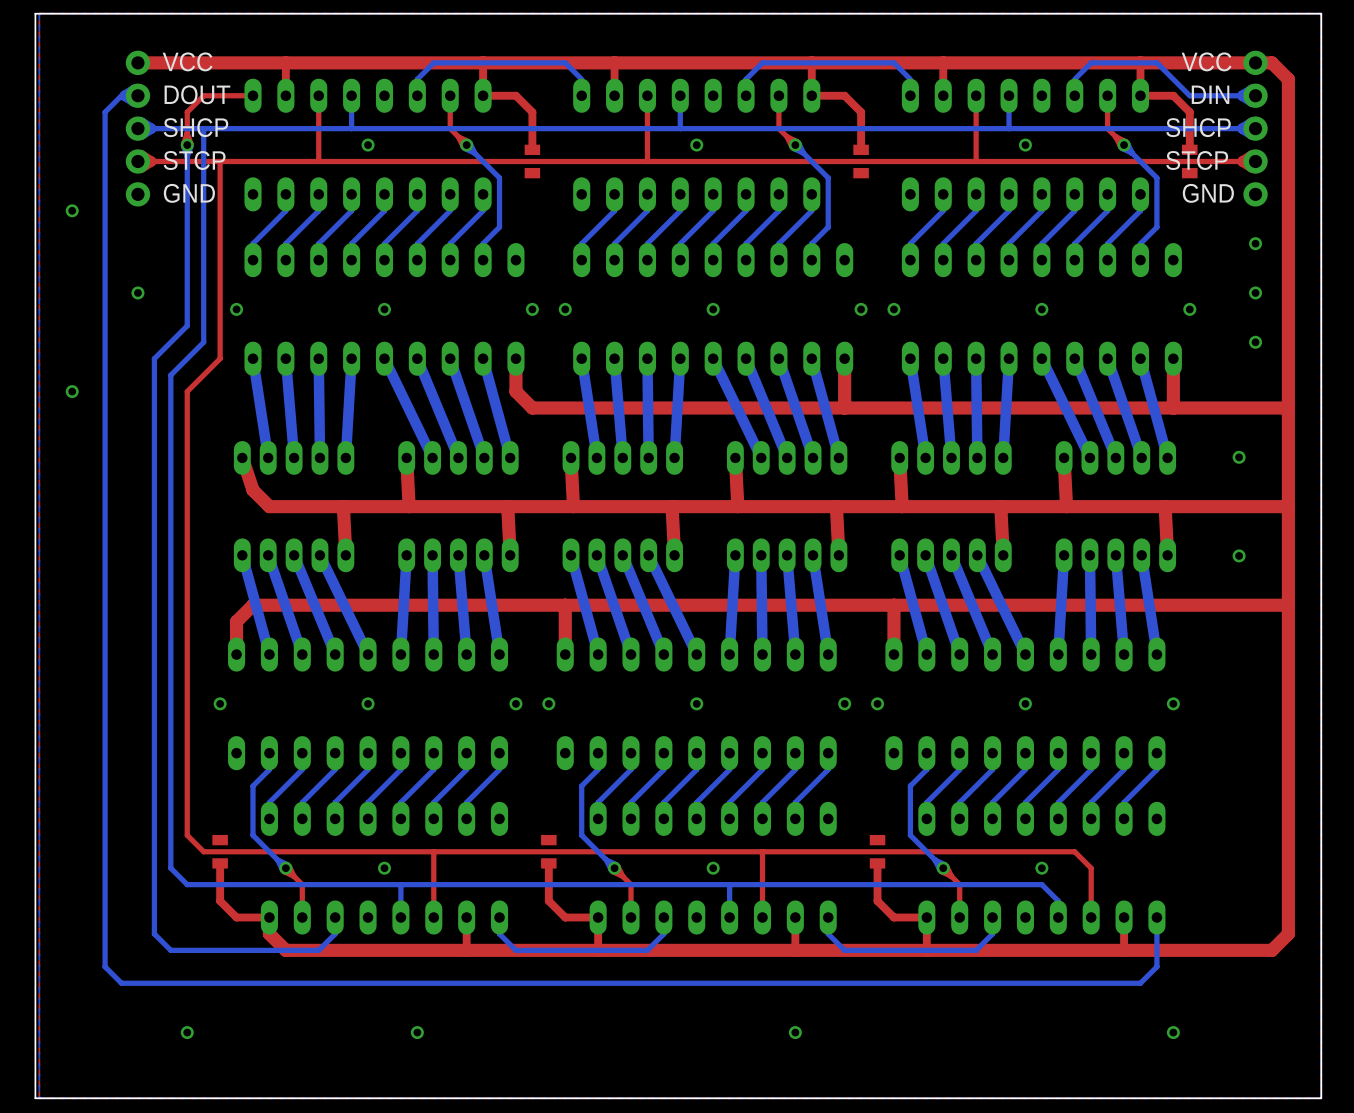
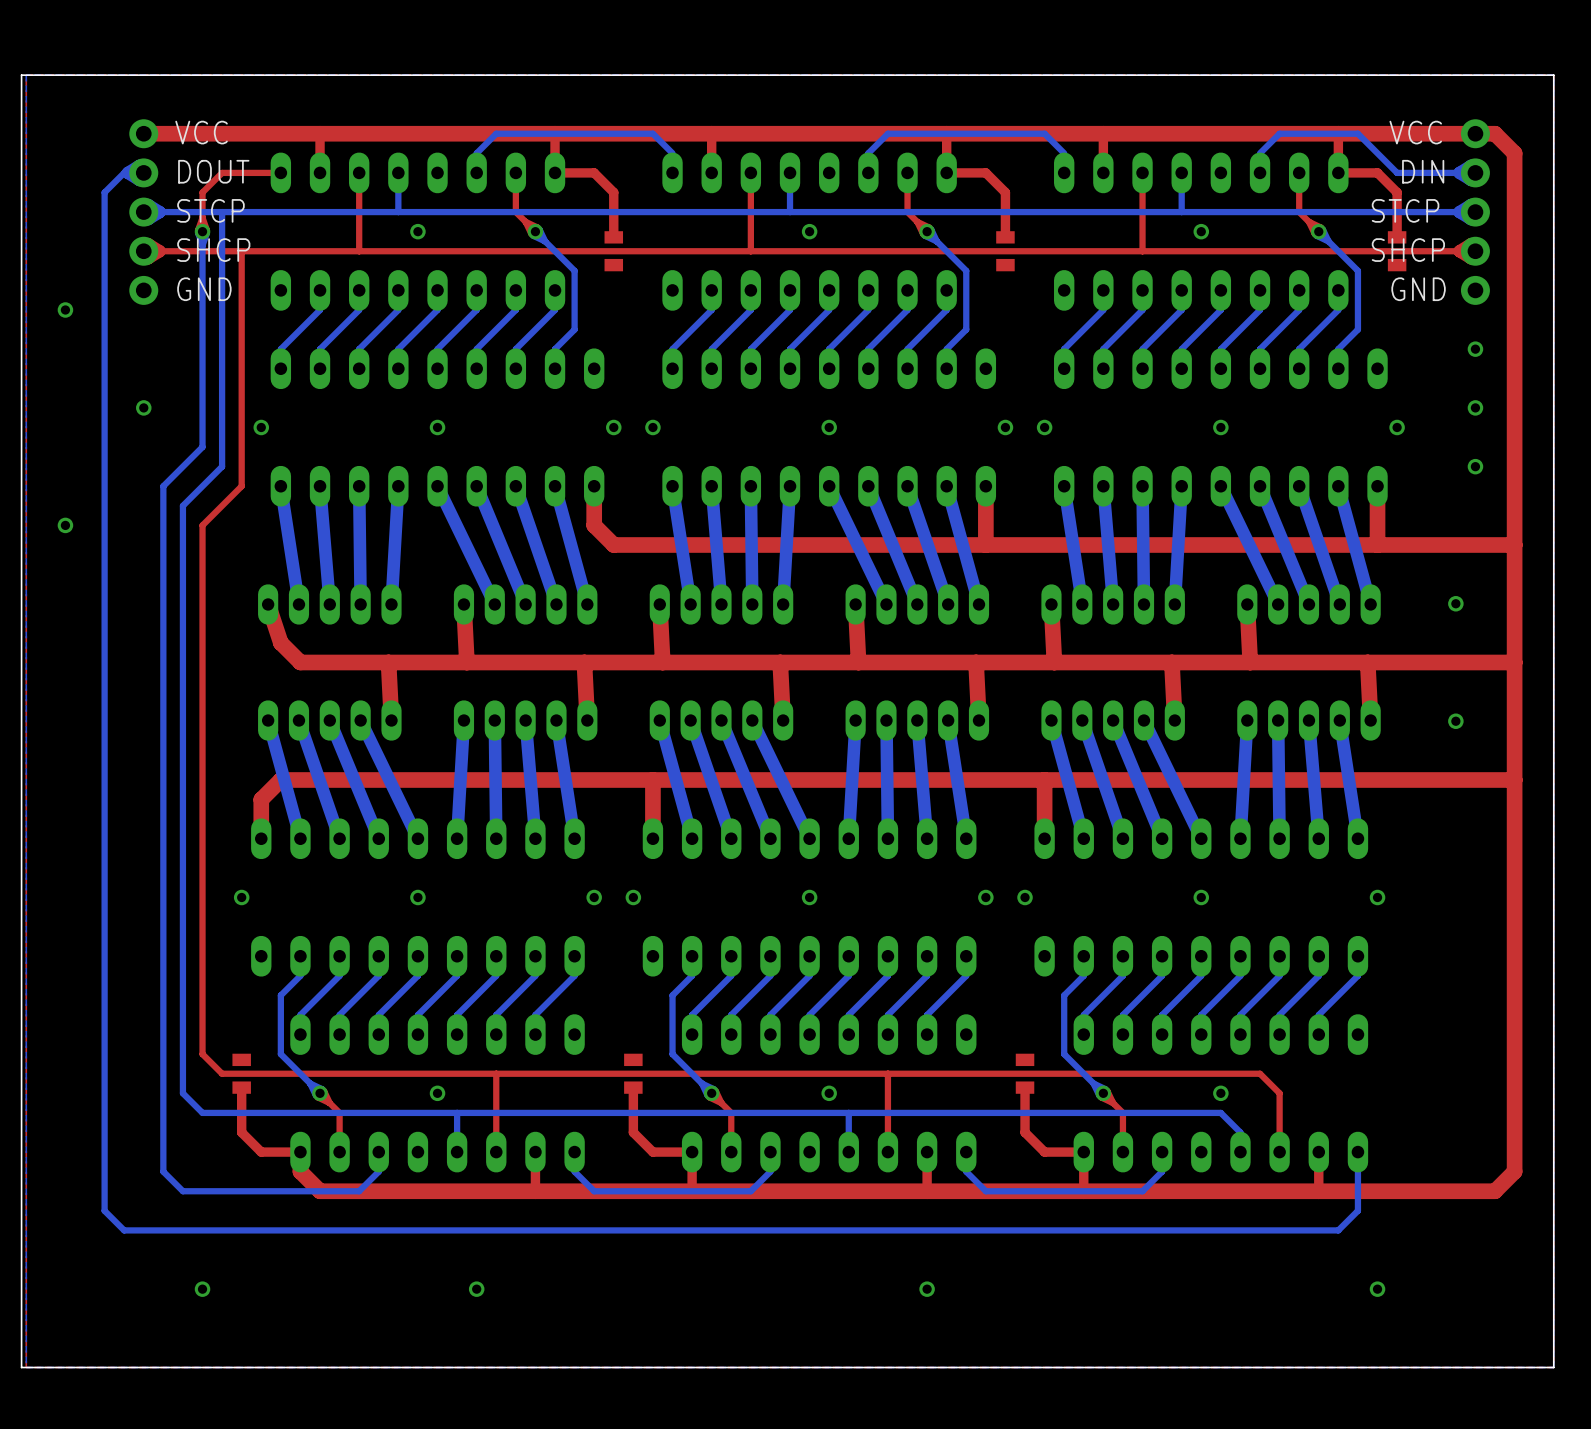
text: SHCP (195, 127) -> STCP (210, 210)
text: SHCP (1198, 127) -> STCP (1405, 210)
text: STCP (194, 160) -> SHCP (213, 250)
text: STCP (1197, 160) -> SHCP (1408, 250)

